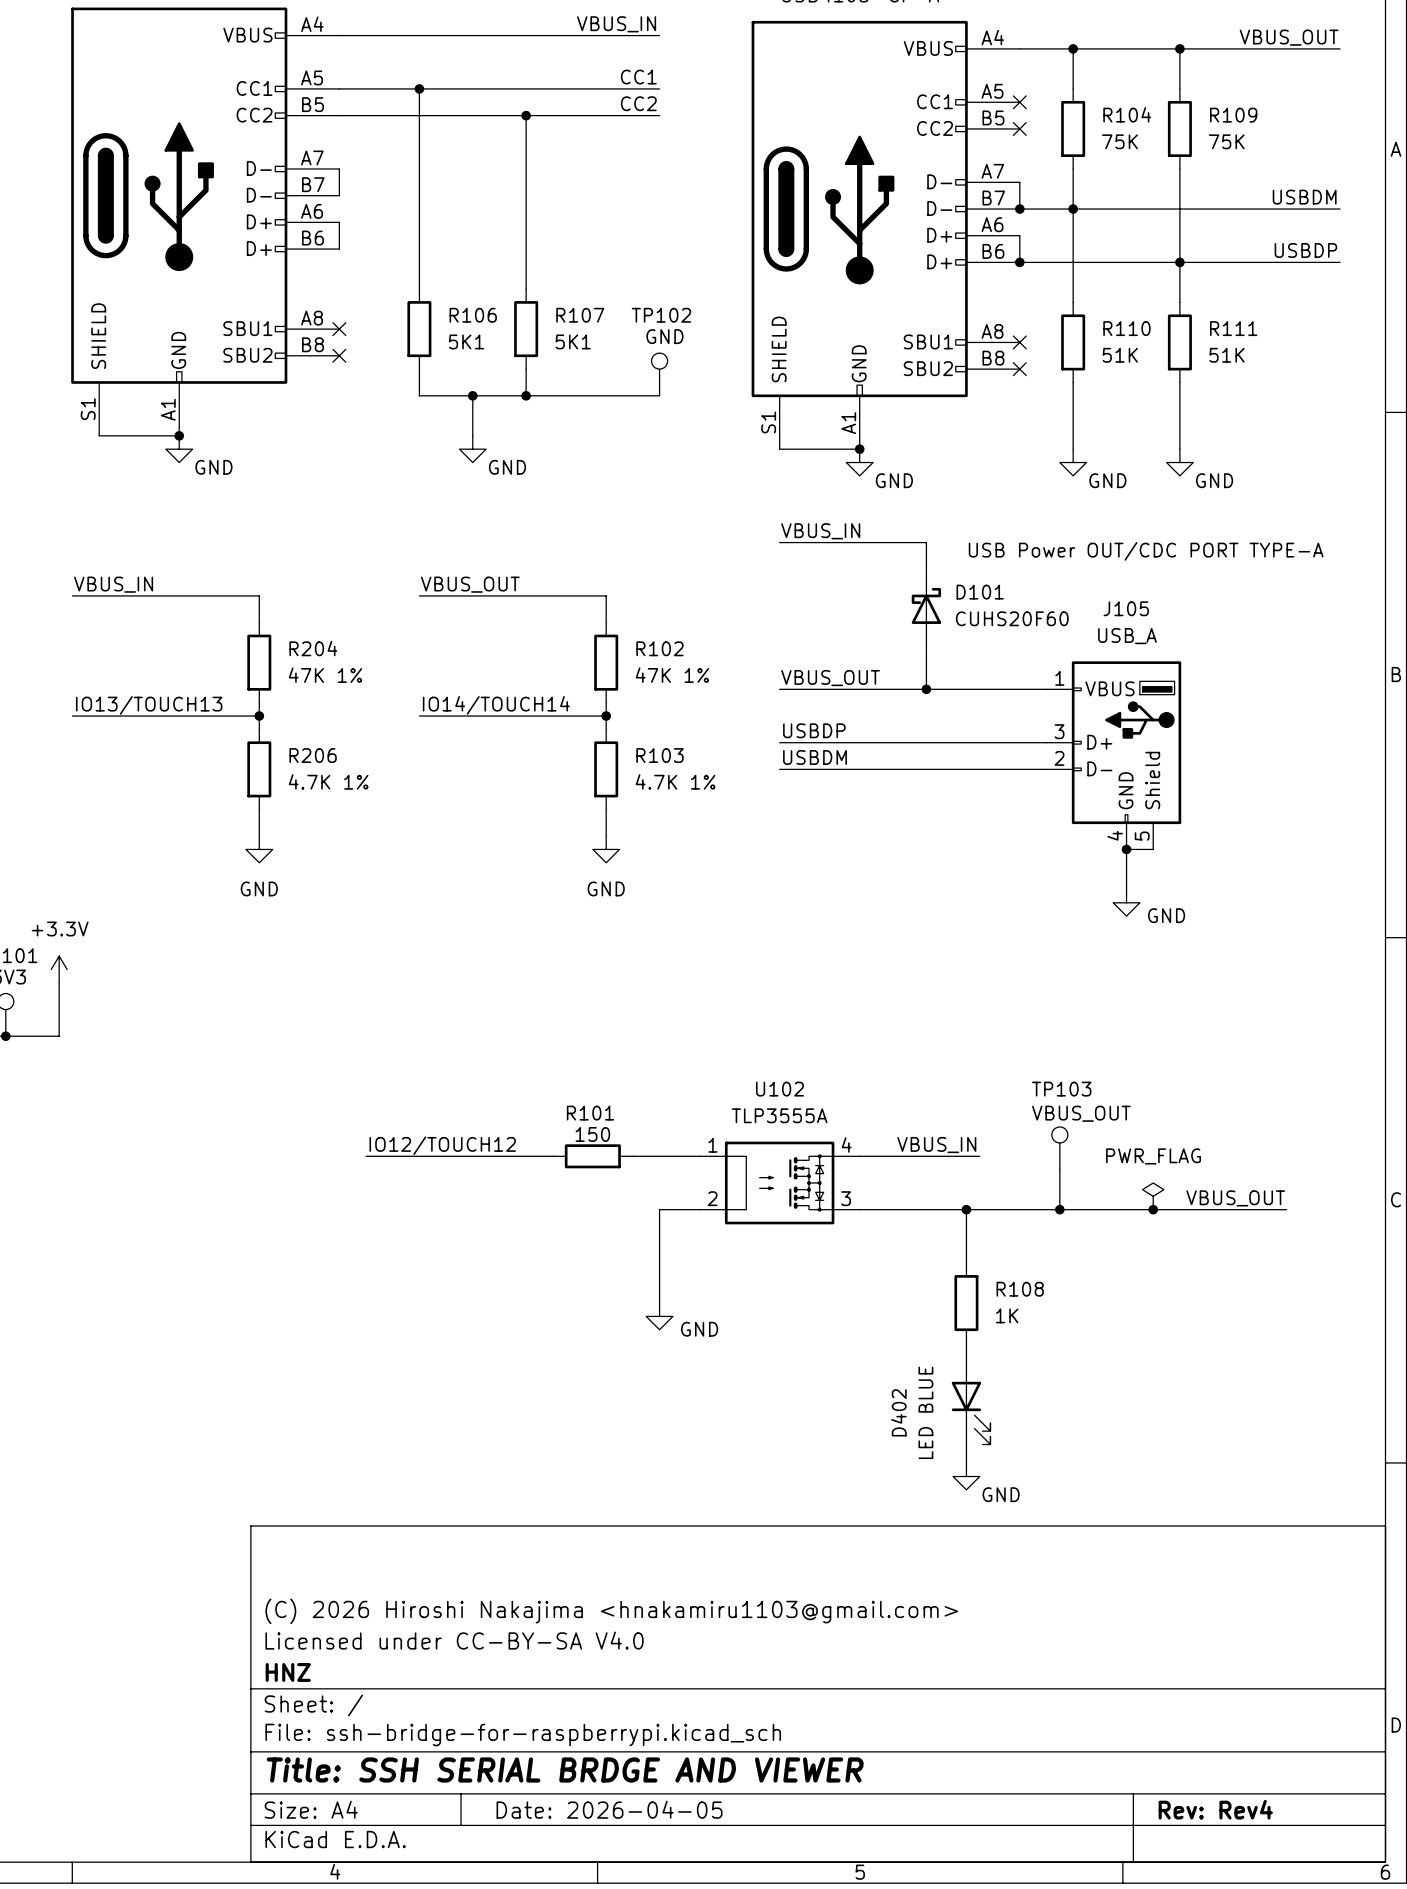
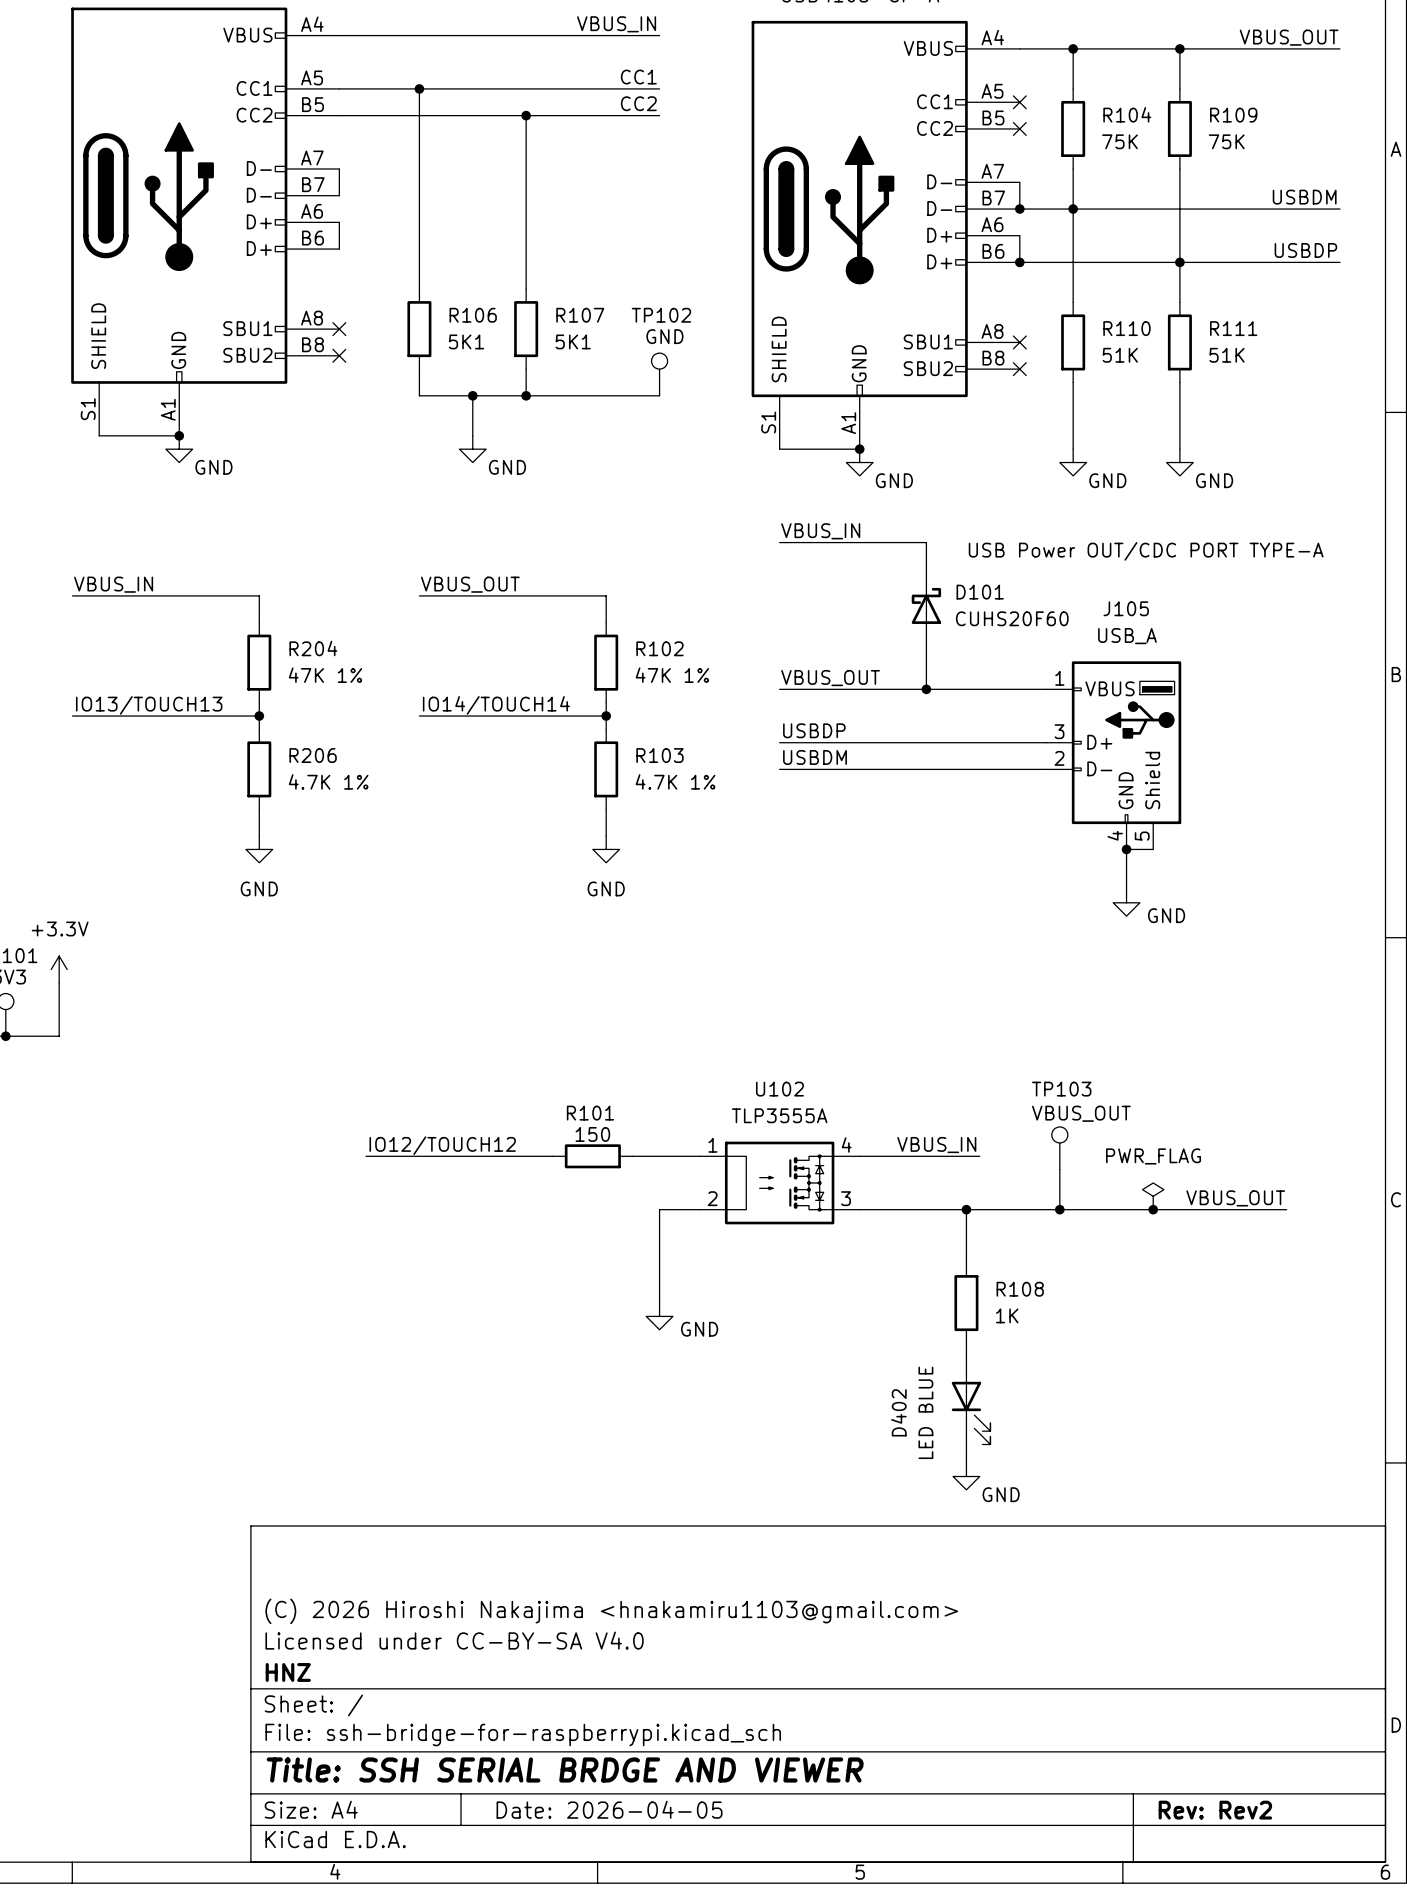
title block: Rev: Rev4 (1215, 1809) -> Rev: Rev2 (1215, 1810)

